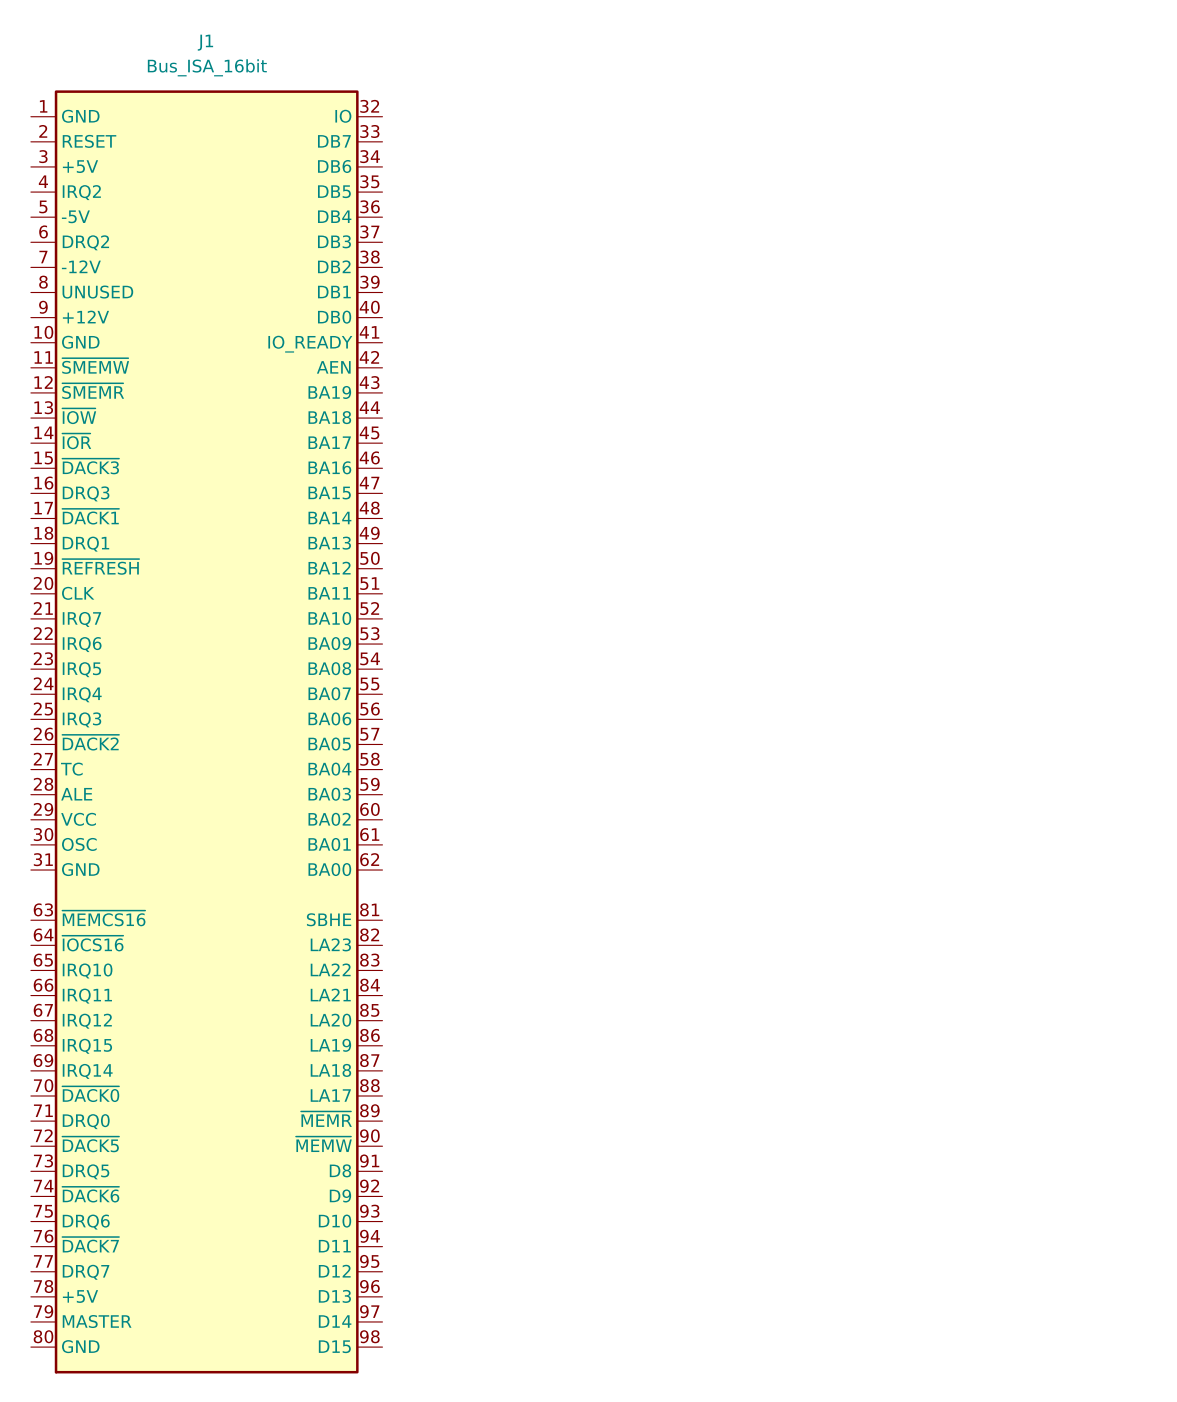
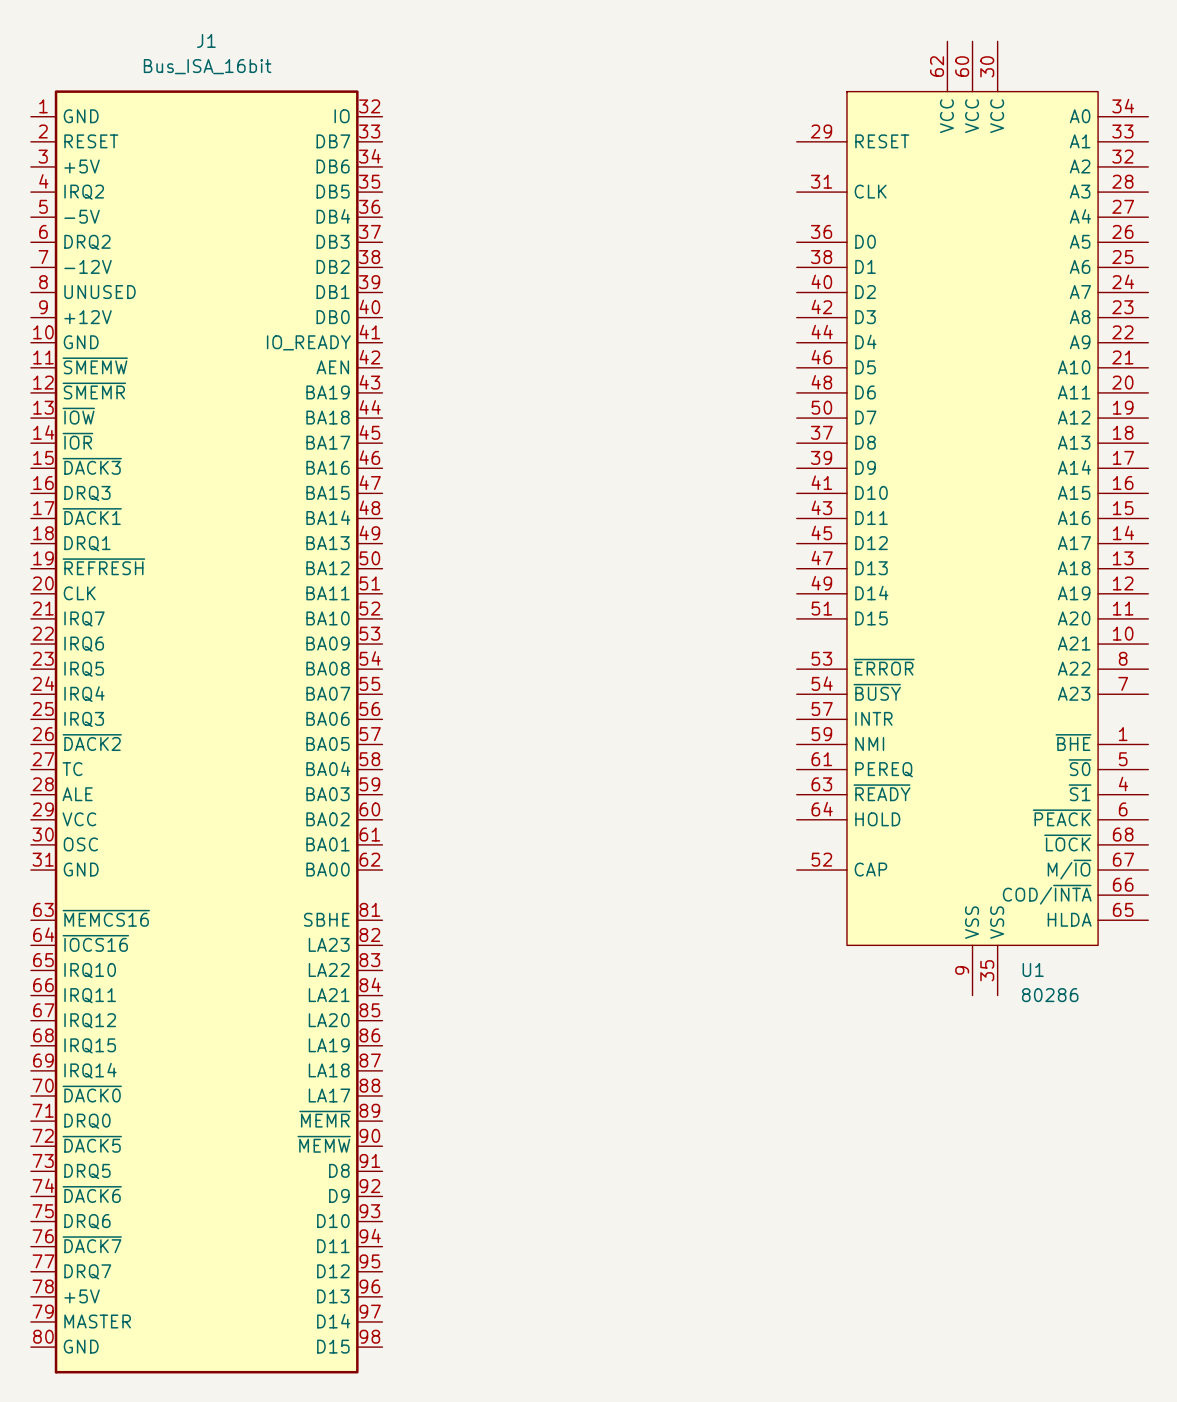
U1: none -> 80286 (972, 518)

